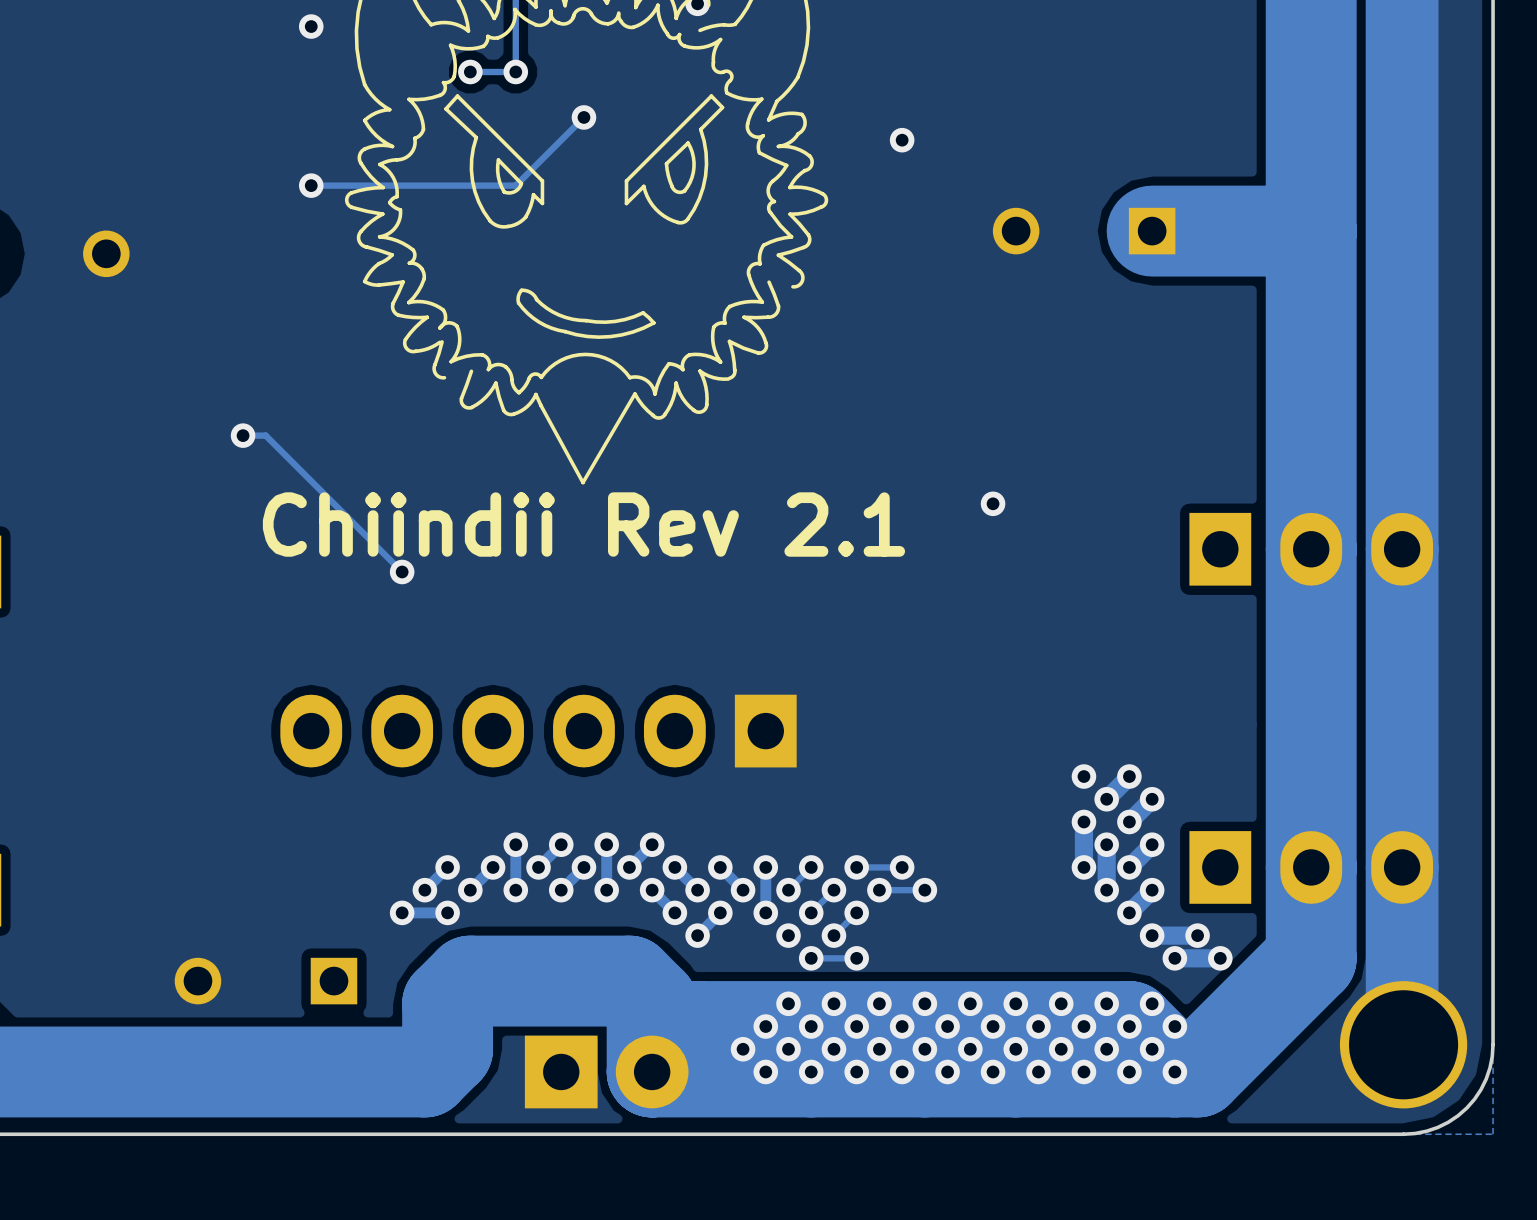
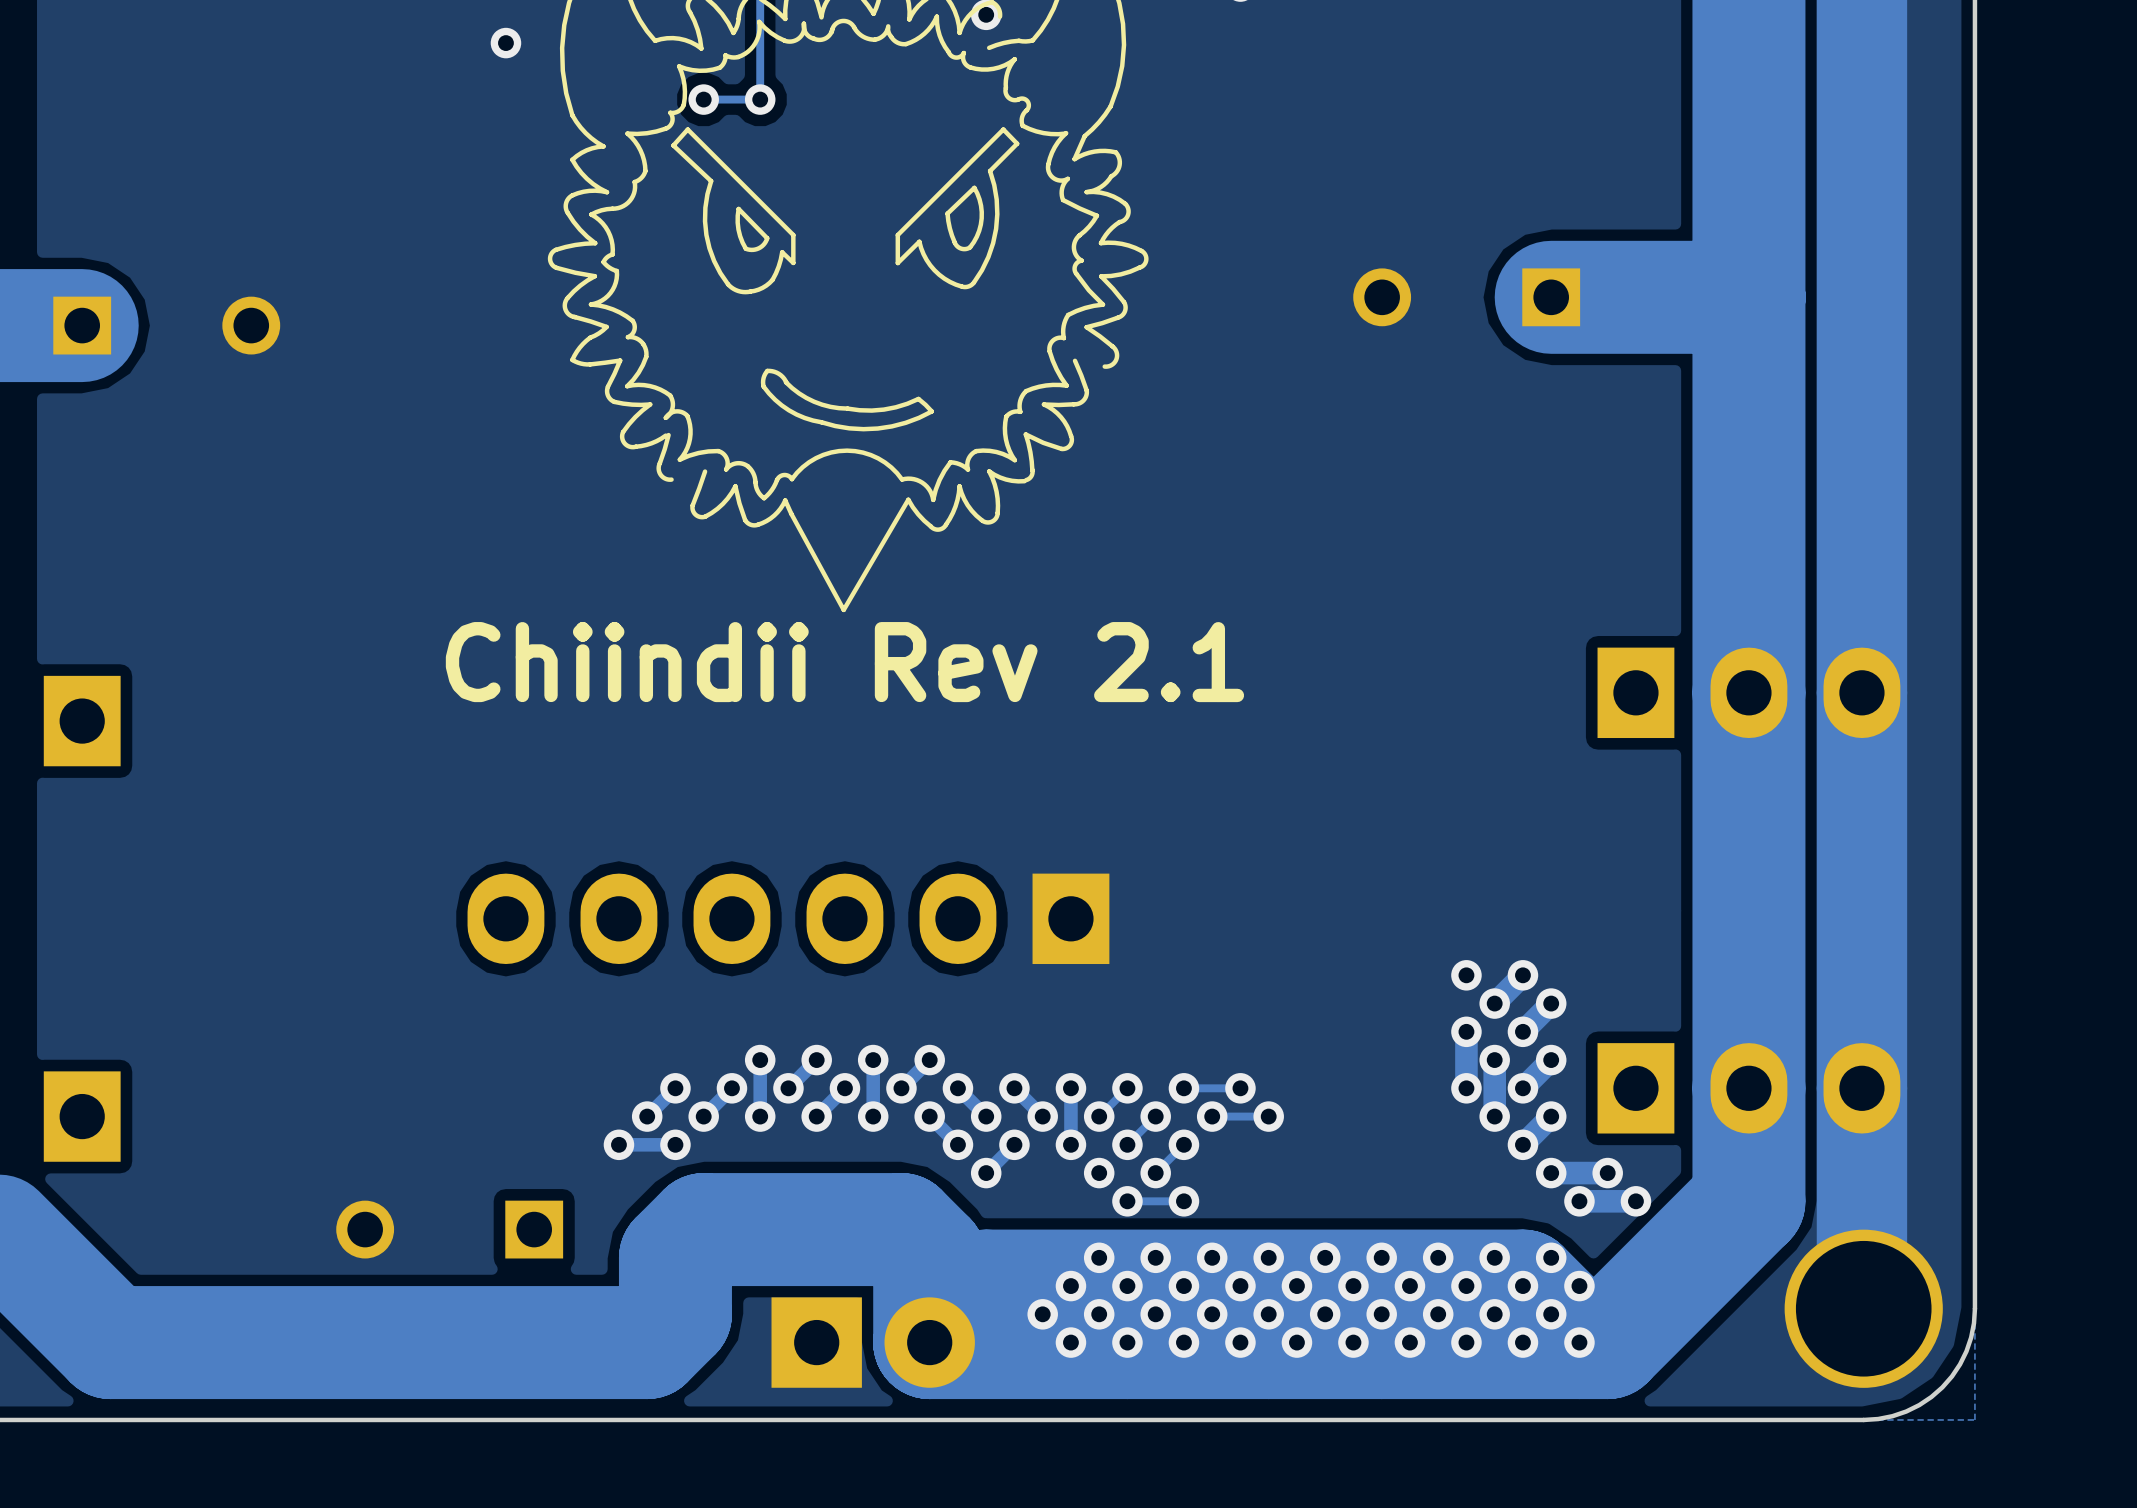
track: (583, 117) (515, 185) (311, 185) -> none
via: (583, 117) -> none
via: (902, 140) -> none
via: (311, 185) -> none
track: (243, 435) (265, 435) (402, 571) -> none
via: (243, 435) -> none
via: (993, 503) -> none
via: (402, 571) -> none

